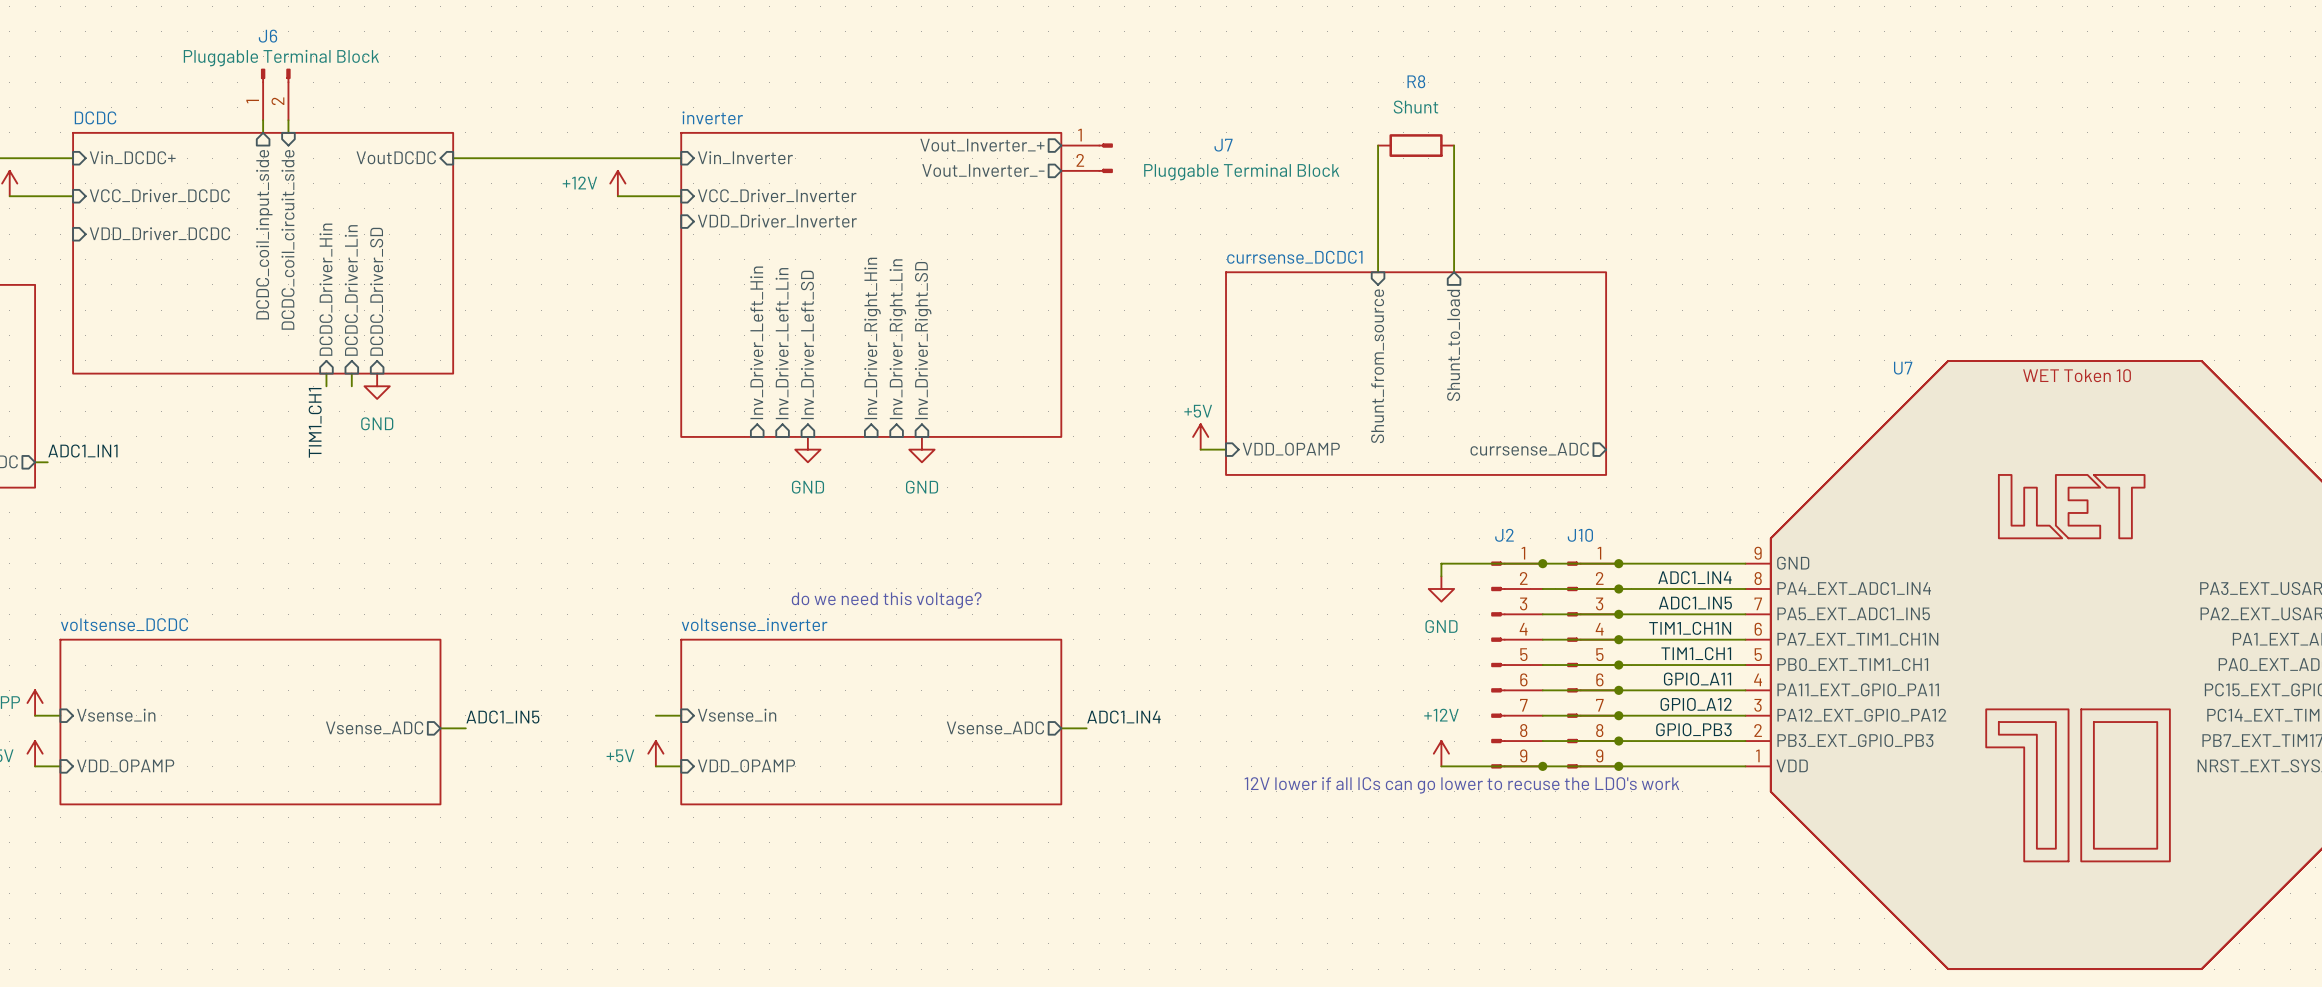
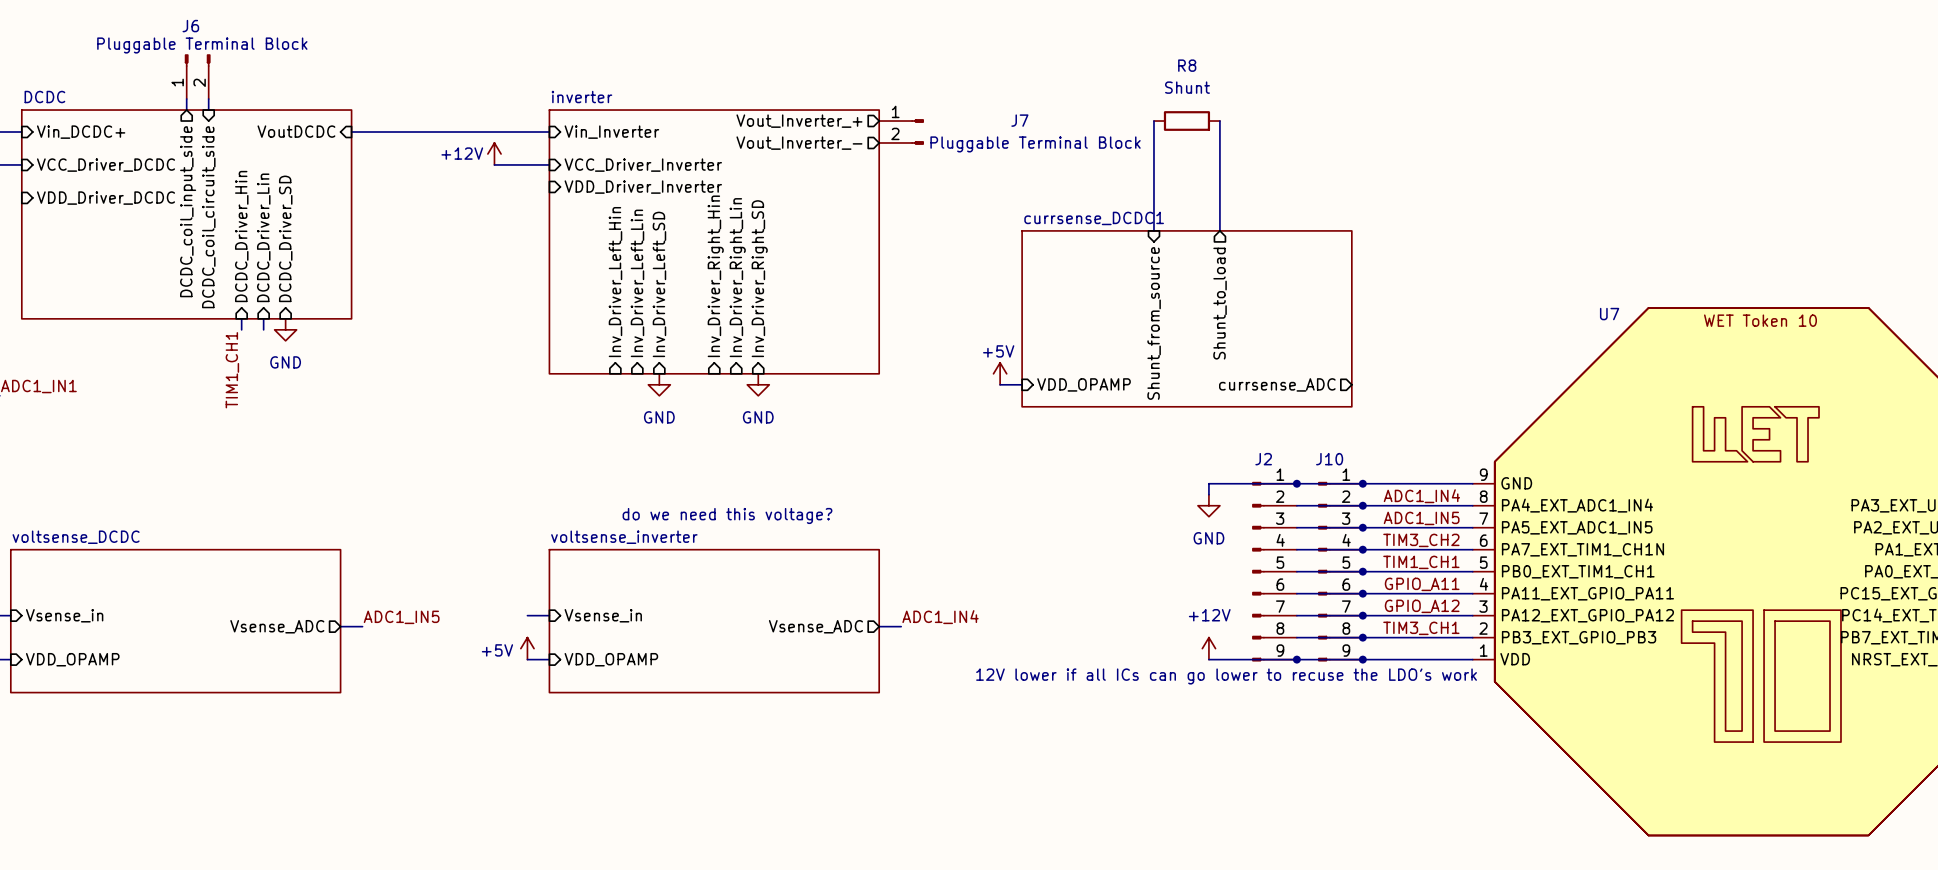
label: TIM1_CH1N (1690, 628) -> TIM3_CH2 (1421, 540)
label: GPIO_PB3 (1693, 729) -> TIM3_CH1 (1421, 628)

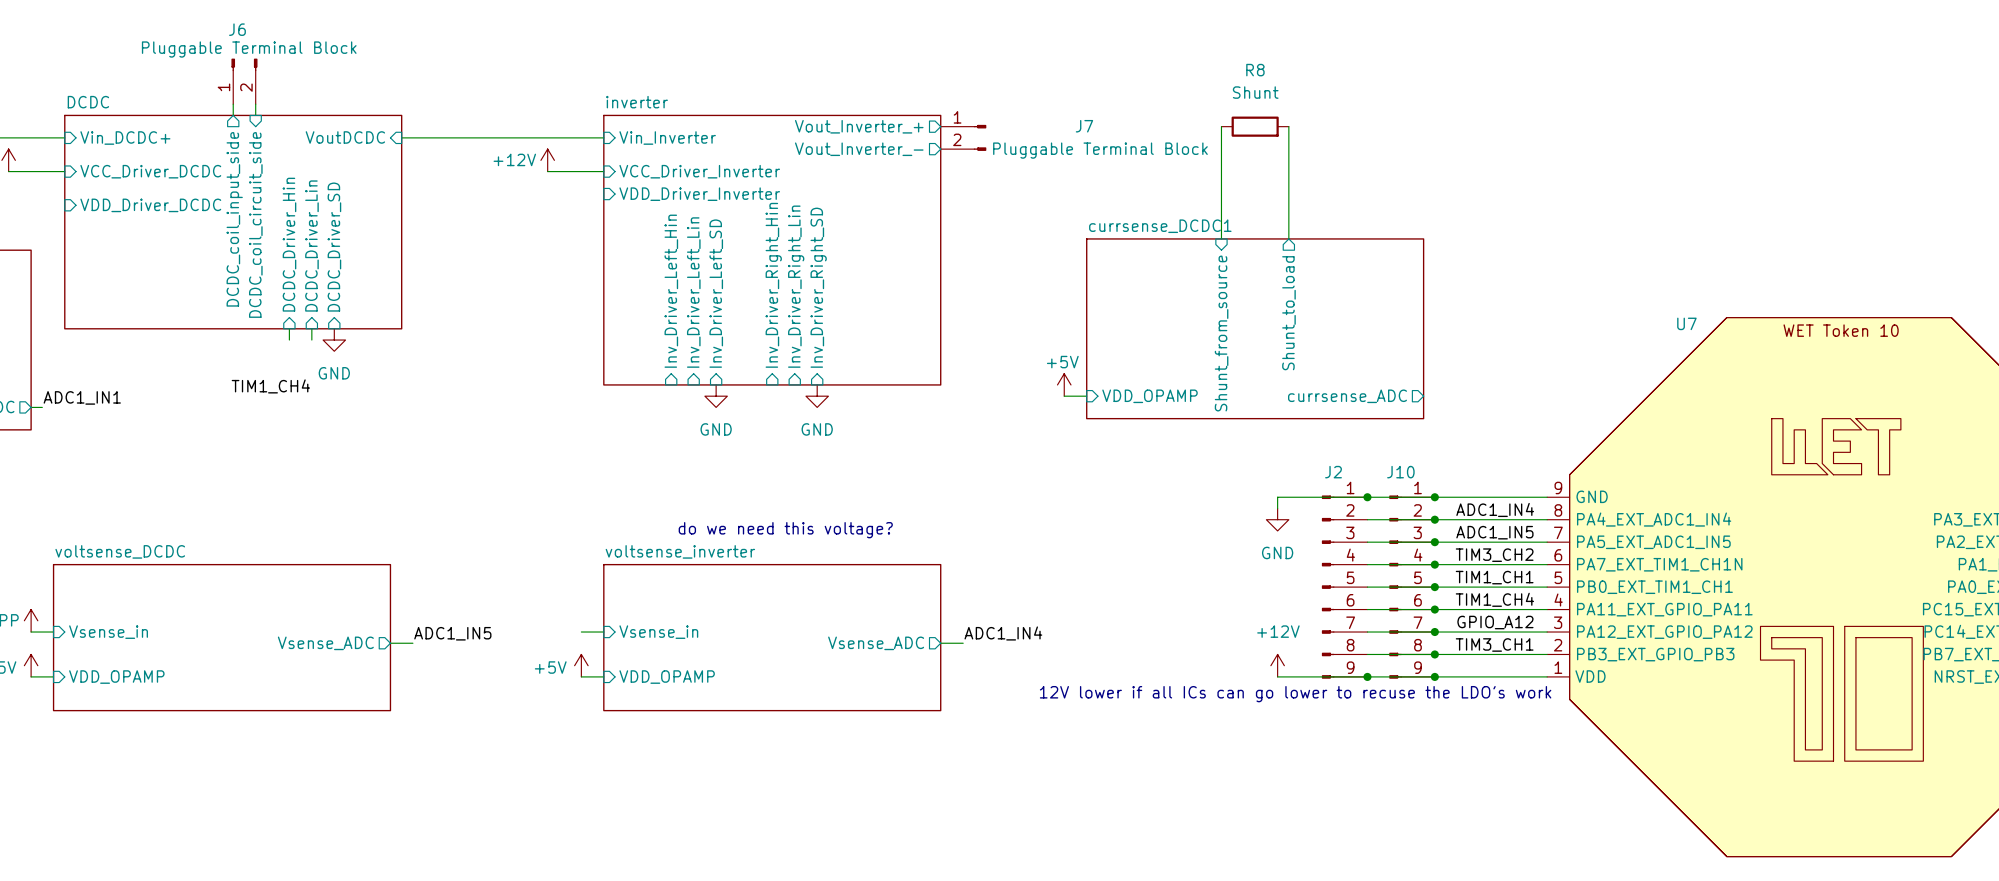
label: TIM1_CH1 (232, 370) -> TIM1_CH4 (270, 386)
label: GPIO_A11 (1422, 584) -> TIM1_CH4 (1494, 599)

